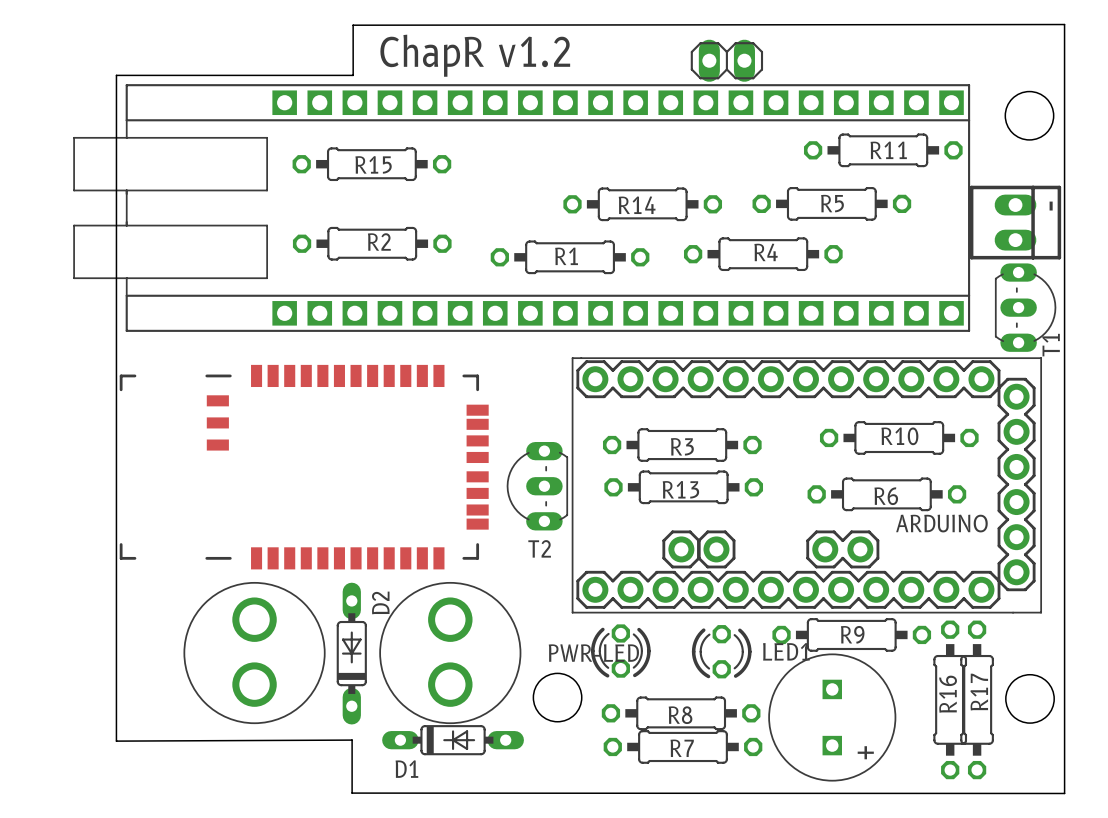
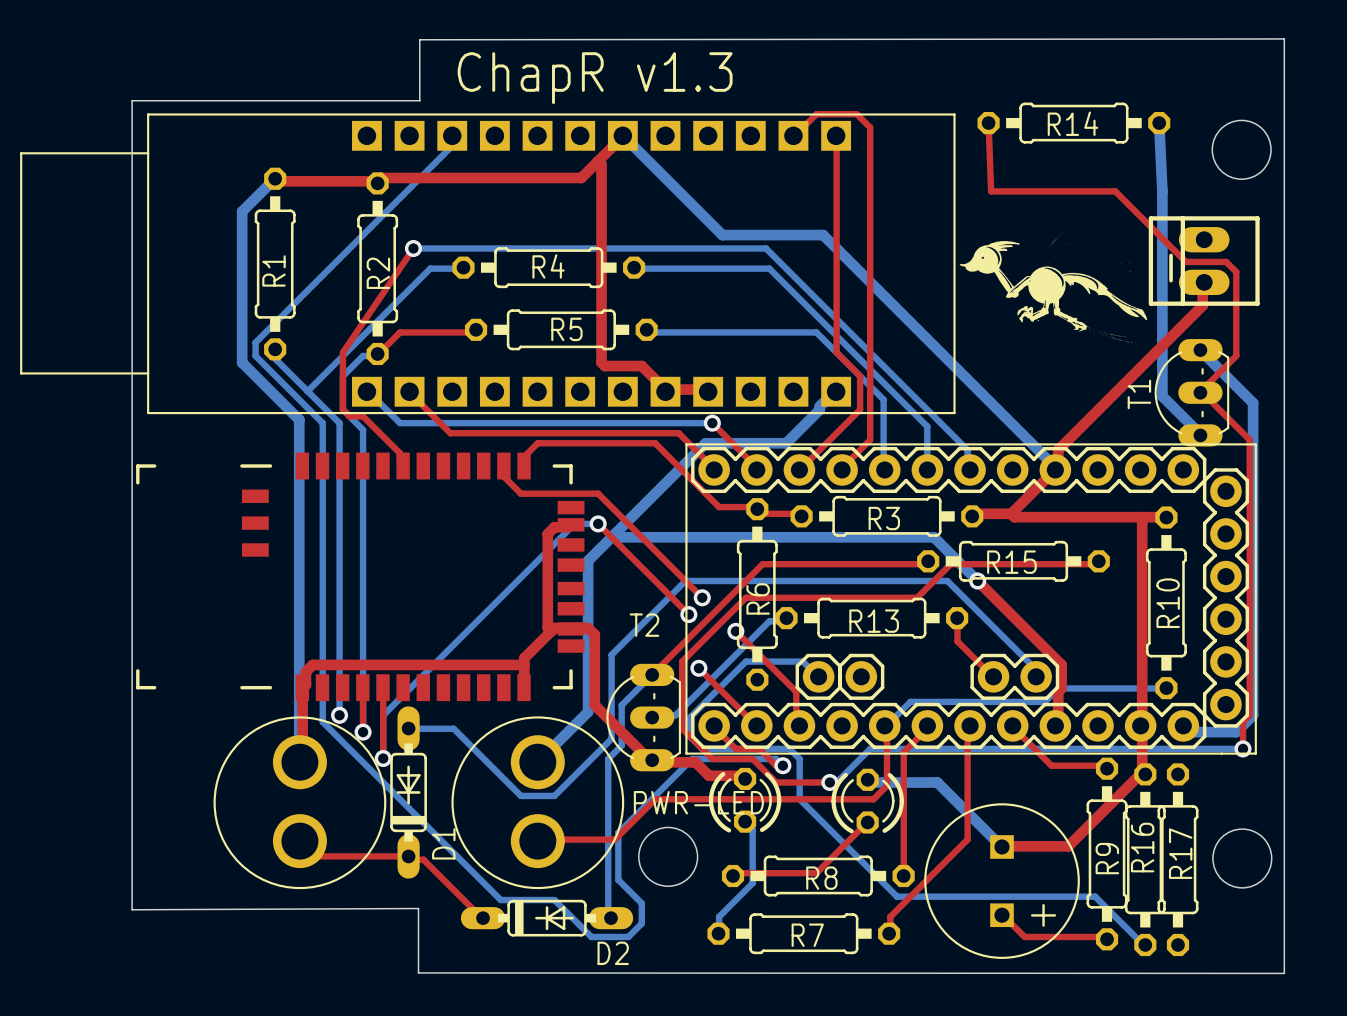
text: ChapR v1.2 (475, 55) -> ChapR v1.3 (595, 78)
part: (726, 60) -> none
top track: none -> (988, 123) (991, 191) (1115, 191) (1185, 261) (1226, 261) (1236, 272) (1236, 355) (1200, 392) (1249, 439) (1249, 715) (1242, 722) (1242, 748)
bottom track: none -> (1159, 123) (1162, 191) (1162, 396) (1200, 435)
bottom track: none -> (452, 135) (450, 137) (450, 147) (255, 342) (255, 355) (322, 423) (322, 722) (500, 900) (554, 900) (591, 936) (628, 936) (641, 923) (641, 903) (618, 879) (618, 832) (692, 758) (776, 758) (782, 765)
top track: none -> (622, 135) (581, 177) (379, 177) (377, 183) (376, 181) (275, 181) (275, 178)
bottom track: none -> (622, 135) (722, 235) (823, 235) (1054, 466) (1055, 469)
top track: none -> (793, 135) (816, 114) (856, 114) (870, 127) (870, 439) (842, 469)
top track: none -> (836, 135) (836, 352) (860, 376) (860, 409) (799, 470)
top track: none -> (598, 161) (601, 164) (601, 362) (604, 366) (641, 366) (665, 391) (668, 389) (705, 389) (708, 391)
bottom track: none -> (275, 178) (242, 211) (242, 362) (299, 419) (299, 762)
R11: (883, 150) -> none
R15 position: (371, 164) -> (1013, 561)
drawing: none -> [959, 229, 1148, 343]
top track: none -> (413, 248) (342, 352) (342, 409) (349, 416) (363, 416) (400, 453) (400, 463) (403, 466)
bottom track: none -> (413, 248) (766, 248) (967, 450) (967, 466) (970, 469)
via: none -> (413, 248)
R5 position: (831, 203) -> (561, 329)
R14 position: (642, 204) -> (1073, 123)
part: (521, 208) -> none
part: none -> (487, 263)
bottom track: none -> (463, 267) (430, 268) (307, 391)
bottom track: none -> (634, 267) (769, 268) (927, 426) (927, 469)
part rotation: 0° (1015, 222) -> 180° (1204, 261)
top track: none -> (1204, 282) (1202, 305) (1058, 450) (1058, 466) (1011, 513)
R2 rotation: 0° (372, 243) -> 90° clockwise (377, 268)
R4 name position: R4 (766, 252) -> R4 (548, 266)
R4 position: (763, 254) -> (548, 267)
R1 rotation: 0° (570, 257) -> 90° clockwise (275, 264)
R1 position: (570, 257) -> (275, 264)
top track: none -> (476, 329) (473, 332) (400, 332) (377, 353)
bottom track: none -> (646, 329) (648, 332) (816, 332) (883, 399) (884, 469)
bottom track: none -> (275, 349) (275, 359) (339, 423) (339, 715)
bottom track: none -> (1200, 350) (1253, 402) (1253, 715) (1236, 732) (1189, 732) (1183, 725)
bottom track: none -> (377, 353) (376, 355) (363, 355) (342, 376) (342, 409) (363, 429) (363, 732)
T1 rotation: 0° (1025, 307) -> 180° (1191, 392)
bottom track: none -> (366, 391) (400, 423) (712, 423)
top track: none -> (409, 391) (450, 433) (678, 433) (714, 469)
bottom track: none -> (836, 391) (819, 406) (819, 409) (786, 443) (705, 443) (588, 560) (588, 711) (537, 762)
top track: none -> (712, 423) (756, 466) (756, 469)
via: none -> (712, 423)
T1 name position: T1 (1051, 345) -> T1 (1139, 394)
top track: none -> (503, 466) (504, 476) (520, 493) (598, 493) (702, 597)
top track: none -> (524, 466) (524, 456) (537, 443) (655, 443) (719, 507) (756, 507) (762, 513) (799, 513) (801, 516)
top track: none -> (1011, 513) (974, 513) (972, 516)
top track: none -> (1011, 513) (1014, 517) (1166, 517)
top track: none -> (1142, 517) (1142, 722) (1140, 725) (1142, 772) (1145, 774) (1138, 775) (1068, 846) (1002, 846)
top track: none -> (598, 523) (688, 614)
bottom track: none -> (598, 523) (574, 523) (383, 715) (383, 758)
via: none -> (598, 523)
top track: none -> (571, 524) (567, 527) (554, 527) (547, 533) (547, 628) (551, 631)
bottom track: none -> (614, 533) (618, 537) (934, 537) (977, 580)
R10 rotation: 0° (899, 437) -> 90° clockwise (1166, 602)
R3 position: (682, 445) -> (886, 516)
top track: none -> (928, 561) (927, 564) (762, 564) (652, 674)
top track: none -> (1098, 561) (1098, 564) (950, 564) (917, 597) (745, 597) (682, 661) (682, 728) (712, 758) (752, 758) (776, 782) (829, 782)
top track: none -> (977, 580) (1061, 664) (1061, 688) (1058, 691) (1058, 725) (1055, 725)
via: none -> (977, 580)
via: none -> (702, 597)
T2 position: (537, 486) -> (643, 717)
R13 position: (683, 487) -> (871, 618)
R6 rotation: 0° (886, 494) -> 90° clockwise (757, 594)
R6 position: (886, 494) -> (757, 594)
via: none -> (688, 614)
bottom track: none -> (786, 618) (786, 621) (769, 621) (675, 715) (655, 715) (652, 717)
top track: none -> (957, 618) (957, 641) (993, 676)
top track: none -> (735, 631) (796, 691) (796, 725) (799, 725)
via: none -> (735, 631)
ARDUINO name: ARDUINO (941, 523) -> none
top track: none -> (524, 664) (312, 664) (305, 671) (305, 685) (302, 687) (302, 758) (299, 762)
top track: none -> (698, 668) (756, 725)
via: none -> (698, 668)
bottom track: none -> (651, 675) (621, 705) (621, 745) (608, 758) (608, 916) (611, 918)
T2 name position: T2 (539, 548) -> T2 (644, 625)
bottom track: none -> (818, 676) (803, 661) (745, 661) (688, 718) (688, 735) (702, 748) (789, 748) (799, 758) (799, 799) (897, 896) (1095, 896) (1145, 944)
bottom track: none -> (1036, 676) (1034, 668) (947, 580) (685, 580) (611, 654) (611, 738) (554, 795) (520, 795) (453, 728) (408, 728)
top track: none -> (362, 687) (363, 732)
top track: none -> (382, 687) (383, 758)
top track: none -> (524, 687) (524, 658) (554, 628) (588, 628) (594, 634) (594, 705) (648, 758) (655, 762) (695, 762) (709, 775) (742, 775) (745, 778)
bottom track: none -> (1166, 688) (1058, 688) (1044, 701) (910, 701) (884, 725)
via: none -> (339, 715)
top track: none -> (714, 725) (735, 748) (759, 748) (776, 765) (782, 765)
top track: none -> (884, 725) (887, 728) (887, 785) (873, 799) (655, 799) (614, 839) (537, 841)
top track: none -> (927, 725) (927, 728) (903, 752) (903, 876)
top track: none -> (970, 725) (967, 728) (967, 839) (890, 916) (889, 933)
top track: none -> (1012, 725) (1051, 765) (1105, 765) (1107, 768)
via: none -> (363, 732)
bottom track: none -> (1242, 748) (870, 748) (836, 782) (829, 782)
via: none -> (1242, 748)
via: none -> (383, 758)
via: none -> (782, 765)
bottom track: none -> (867, 779) (870, 782) (937, 782) (1002, 846)
R9 rotation: 0° (851, 634) -> 90° clockwise (1107, 854)
via: none -> (829, 782)
LED1 name: LED1 (786, 651) -> none
D2 rotation: 0° (351, 653) -> 90° clockwise (547, 918)
D2 position: (351, 653) -> (547, 918)
bottom track: none -> (745, 821) (752, 829) (752, 883) (719, 916) (718, 933)
top track: none -> (867, 822) (816, 873) (735, 873) (733, 876)
top track: none -> (299, 841) (316, 856) (406, 856) (410, 859) (423, 859) (483, 918)
D1 rotation: 0° (453, 740) -> 90° counterclockwise (408, 792)
D1 position: (453, 740) -> (408, 792)
top track: none -> (1002, 915) (1024, 936) (1105, 936) (1107, 939)
R7 position: (682, 746) -> (803, 933)

